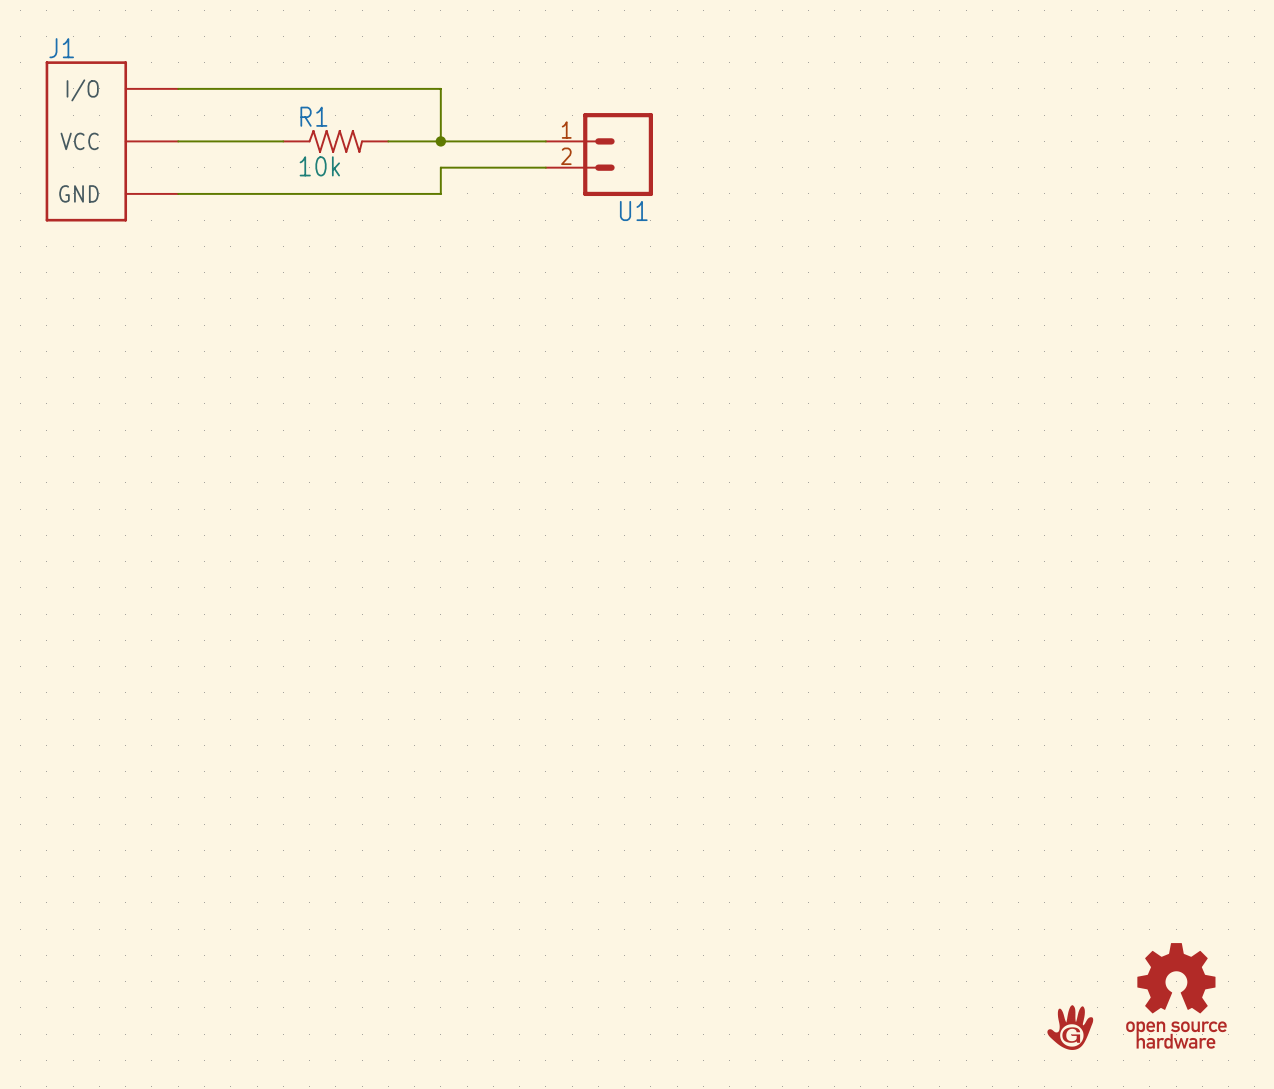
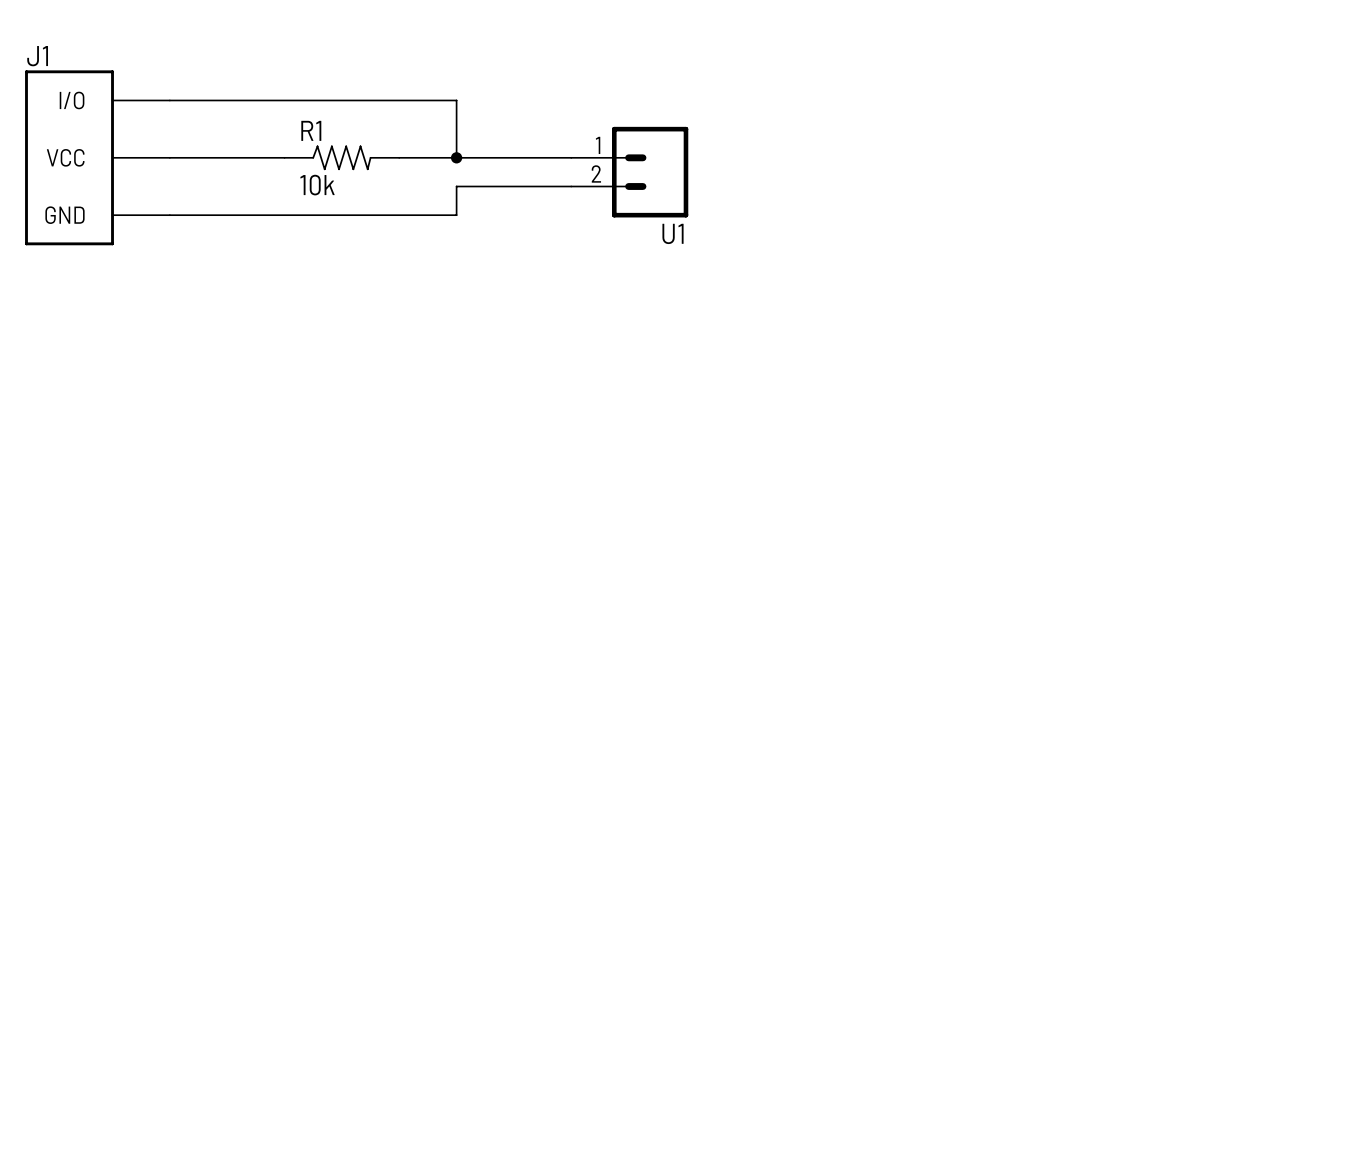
part: (1176, 995) -> none
part: (1070, 1027) -> none

